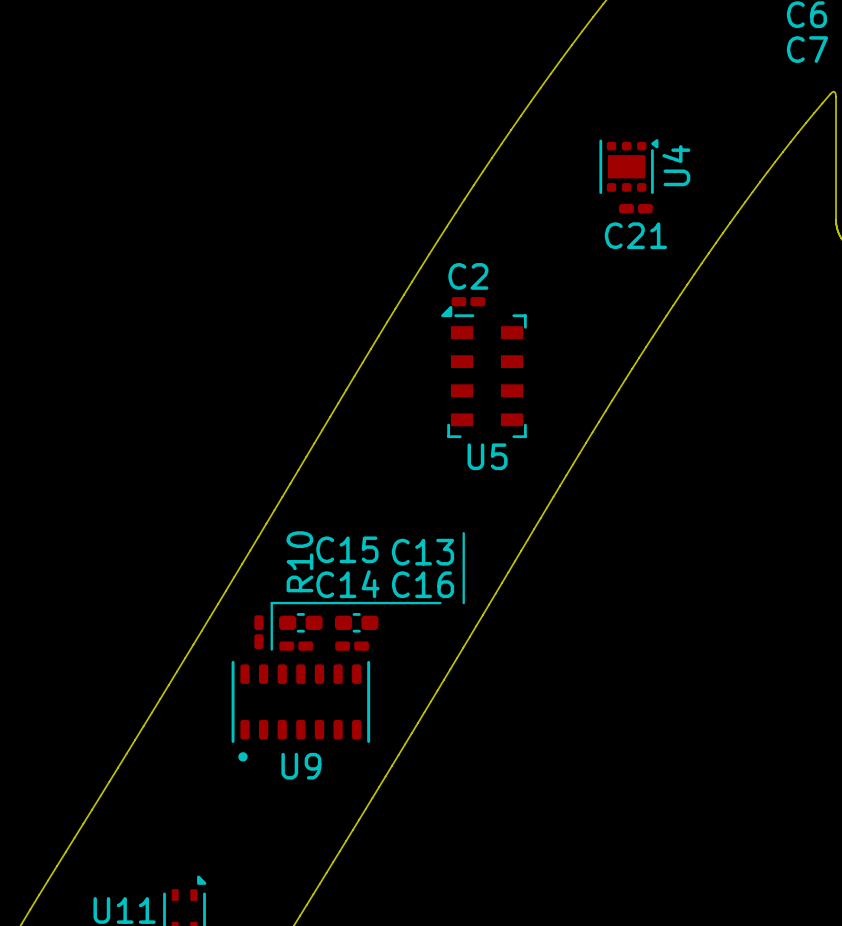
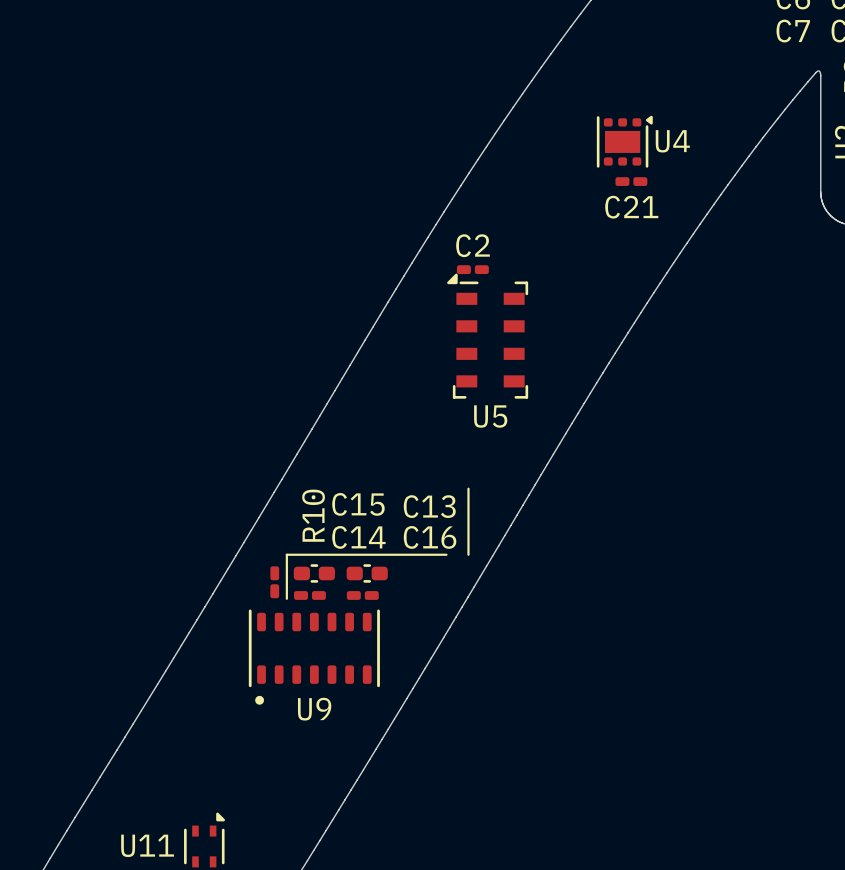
U4 name rotation: 0° (676, 165) -> 90° clockwise (672, 141)

